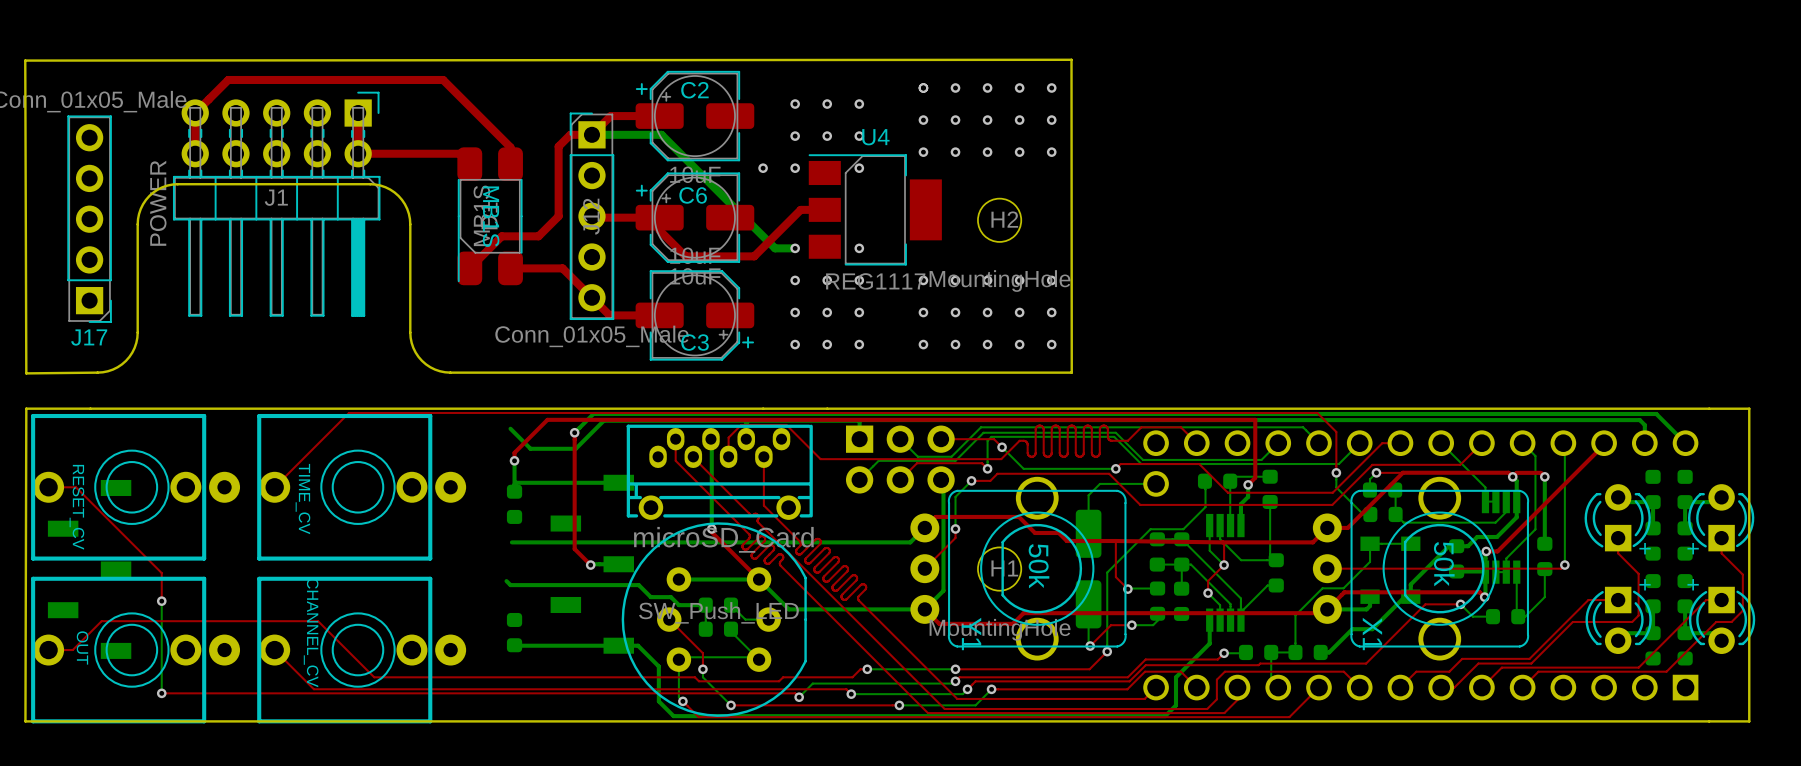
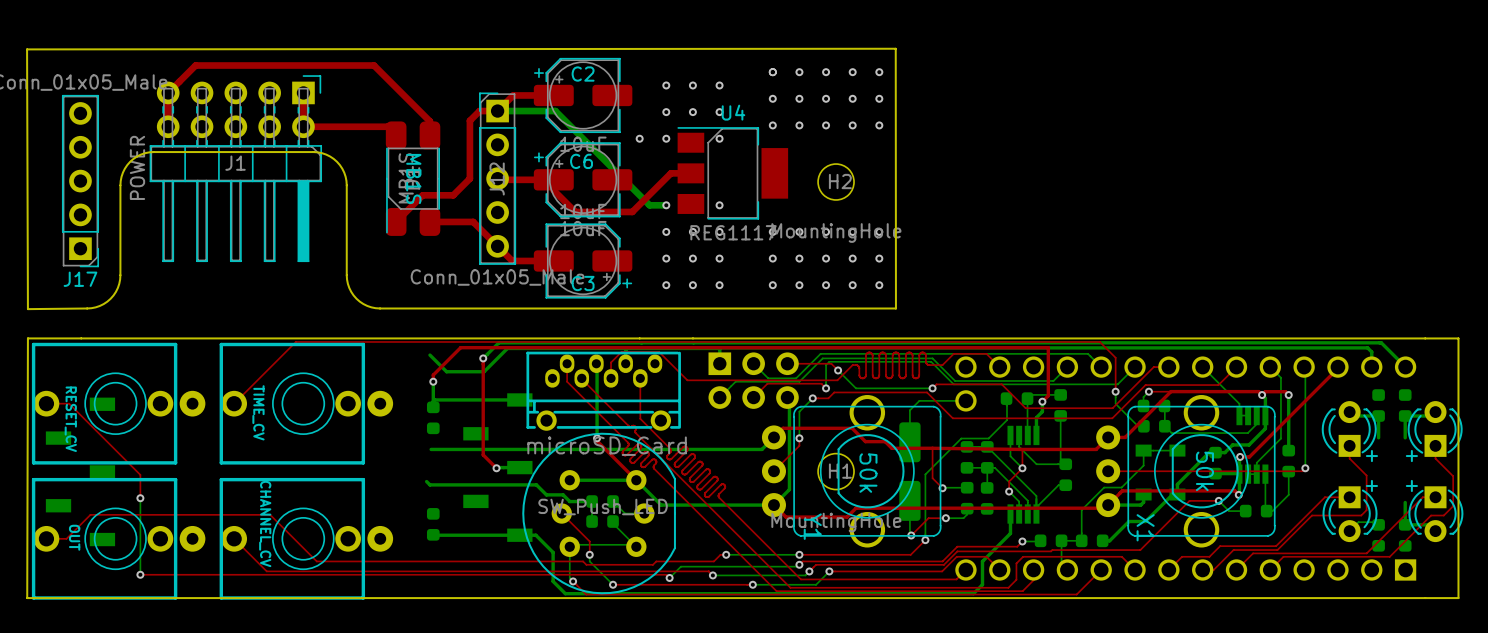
part: (1653, 541) -> none
part: (1685, 541) -> none
part: (1653, 593) -> none
part: (1685, 593) -> none
bottom track: (1653, 606) (1653, 633) (1625, 633) -> (1379, 522) (1358, 522) (1355, 524)

